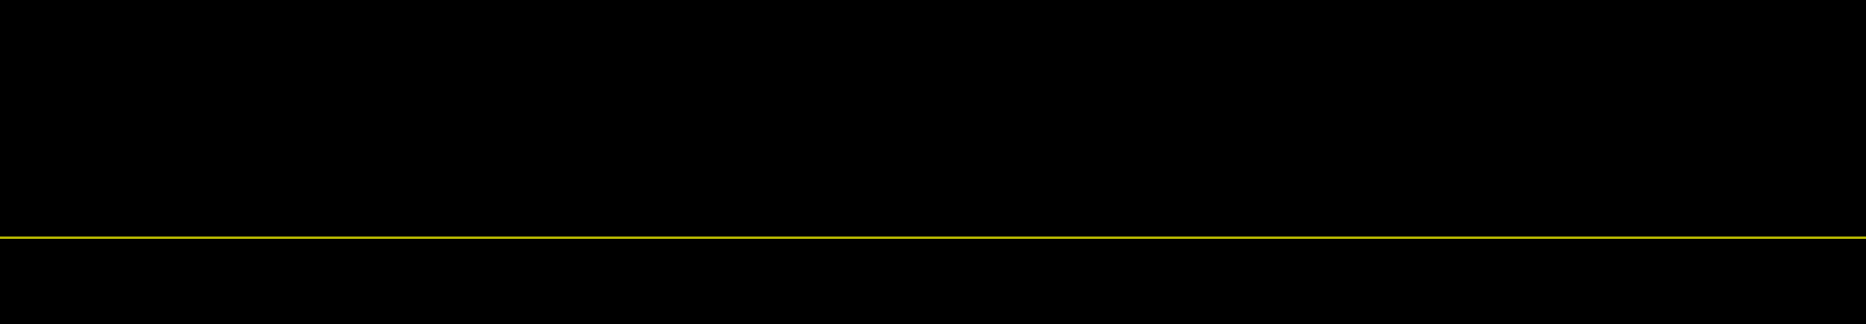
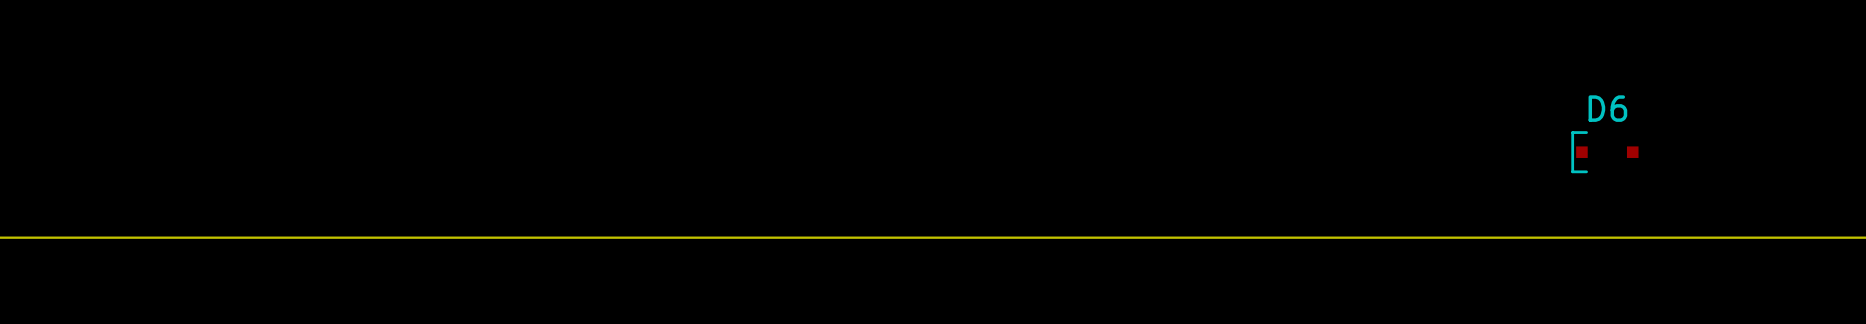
D6: none -> (1604, 152)

